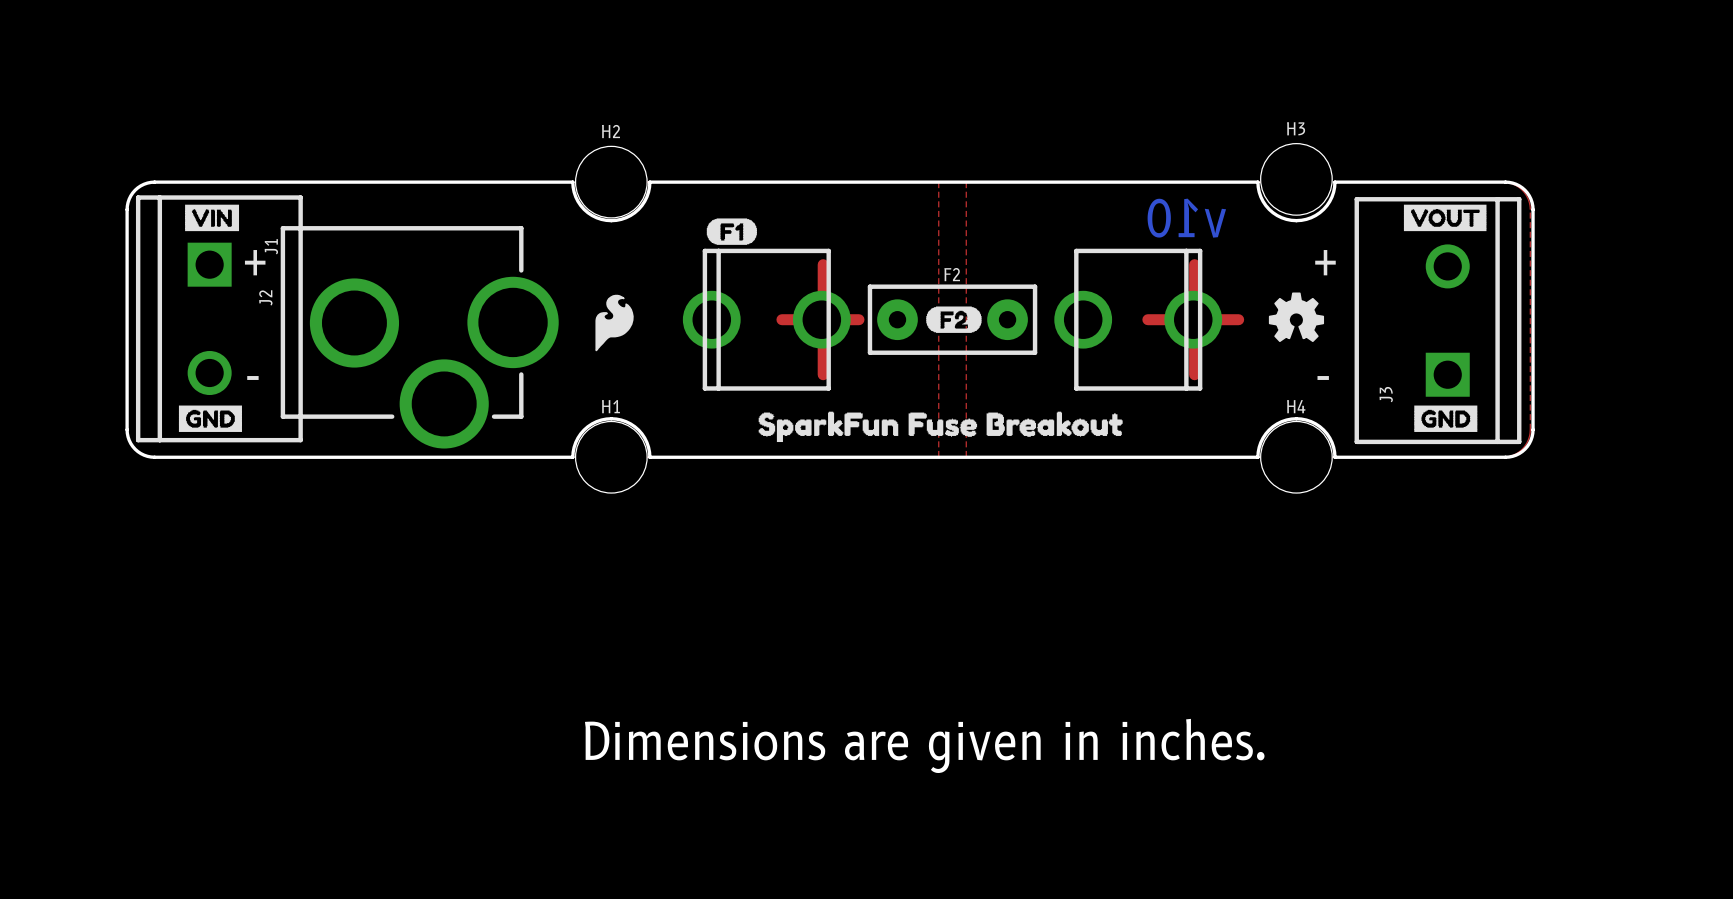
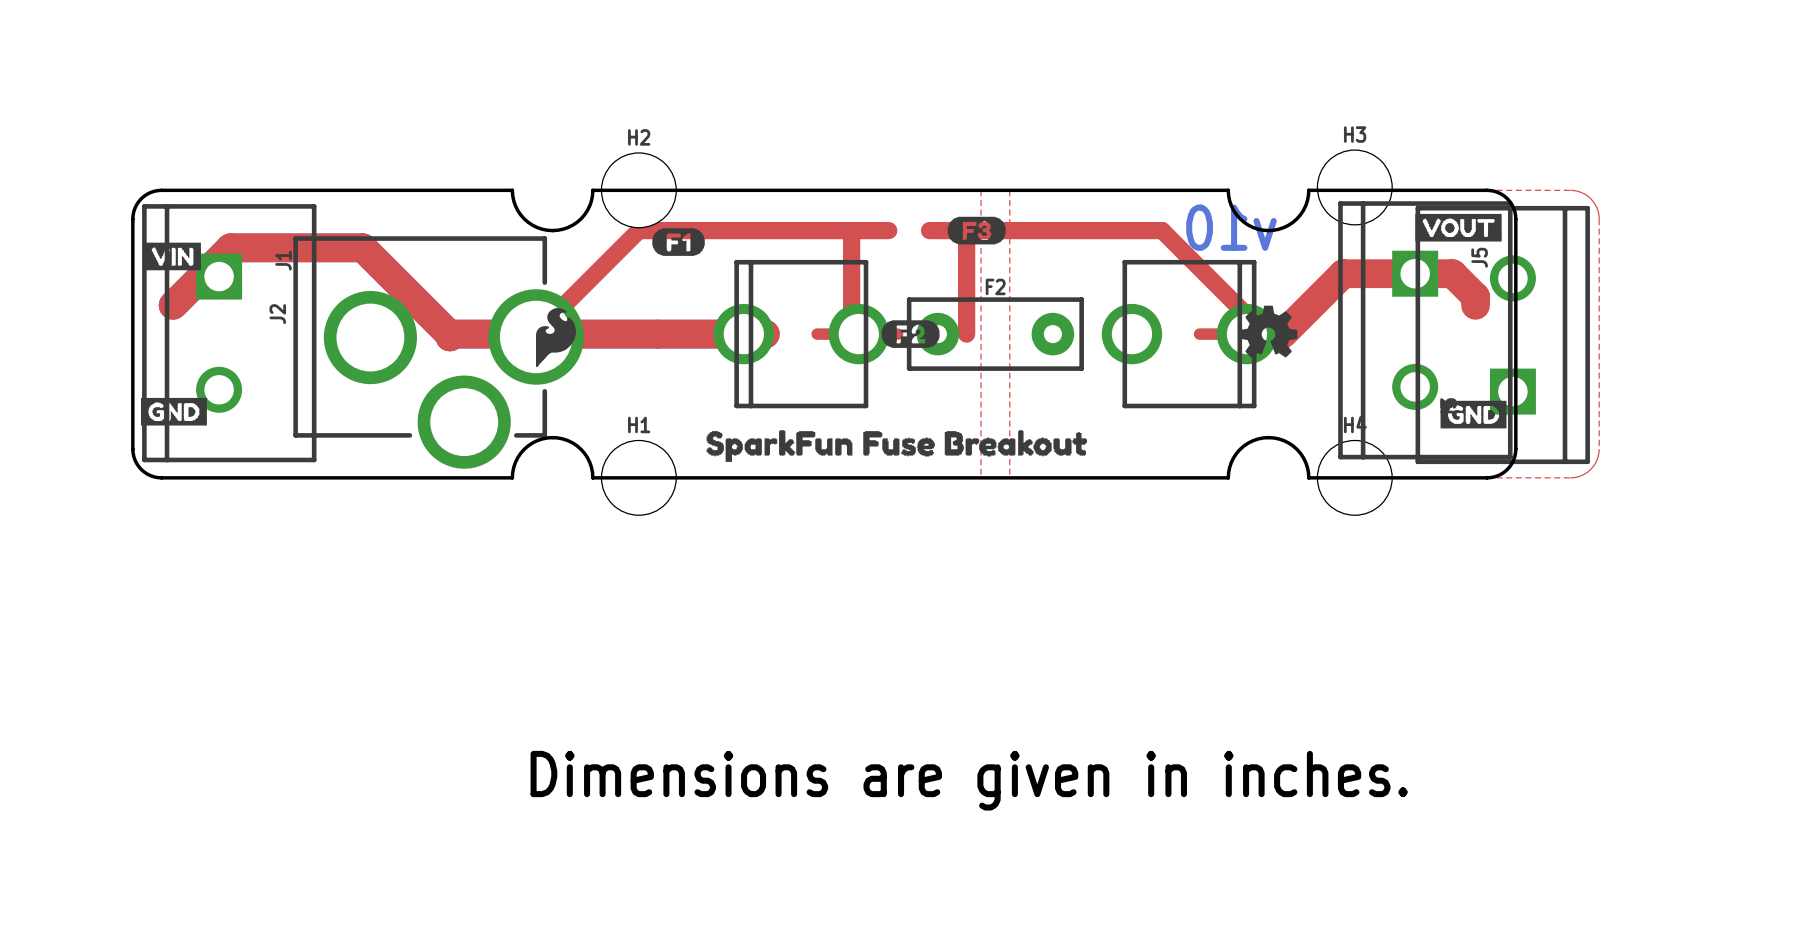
board edge: (490, 182) (567, 182) -> (512, 190) (515, 205) (524, 218) (537, 227) (552, 230) (568, 227) (581, 218) (589, 205) (592, 190)
board edge: (572, 182) (575, 196) (584, 209) (596, 217) (611, 220) (626, 217) (638, 209) (646, 196) (649, 182) -> (598, 190) (679, 190)
board edge: (1175, 182) (1252, 182) -> (1228, 190) (1231, 205) (1240, 218) (1253, 227) (1268, 230) (1283, 227) (1297, 218) (1305, 205) (1308, 190)
board edge: (1257, 182) (1260, 196) (1269, 209) (1281, 217) (1296, 220) (1311, 217) (1323, 209) (1332, 196) (1334, 182) -> (1314, 190) (1395, 190)
board edge: (1422, 182) (1512, 183) (1527, 192) (1533, 209) (1533, 429) (1530, 440) (1522, 451) (1509, 457) (1422, 457) -> (1487, 190) (1498, 192) (1507, 198) (1513, 208) (1515, 219) (1515, 452) (1511, 463) (1504, 471) (1487, 477)
drawing: none -> [947, 216, 1006, 245]
drawing position: (212, 217) -> (172, 256)
drawing position: (1445, 217) -> (1458, 227)
top track: none -> (851, 230) (851, 334)
top track: none -> (888, 230) (638, 230) (535, 334)
top track: none -> (929, 230) (1162, 230) (1265, 334)
top track: none -> (966, 230) (966, 334)
drawing position: (731, 231) -> (678, 242)
text: + (255, 262) -> none
text: + (1325, 262) -> none
top track: (823, 264) (823, 374) -> none
top track: (1194, 264) (1194, 374) -> none
top track: none -> (173, 305) (230, 247) (362, 247) (449, 336) (452, 334) (765, 334)
J5: none -> (1425, 330)
drawing position: (1296, 317) -> (1268, 331)
drawing position: (953, 319) -> (910, 334)
top track: (1227, 319) (1238, 319) -> (1282, 334) (1343, 273) (1452, 273) (1475, 296) (1475, 305)
drawing position: (614, 323) -> (555, 337)
text: - (252, 378) -> none
text: - (1323, 378) -> none
drawing position: (210, 418) -> (173, 411)
drawing position: (1445, 418) -> (1473, 414)
drawing position: (940, 426) -> (896, 446)
board edge: (490, 457) (567, 457) -> (512, 477) (515, 462) (524, 449) (537, 440) (552, 437) (568, 440) (581, 449) (589, 462) (592, 477)
board edge: (572, 457) (575, 442) (584, 430) (596, 421) (611, 418) (626, 421) (638, 430) (646, 442) (649, 457) -> (598, 477) (679, 477)
board edge: (1175, 457) (1252, 457) -> (1228, 477) (1231, 462) (1240, 449) (1253, 440) (1268, 437) (1283, 440) (1297, 449) (1305, 462) (1308, 477)
board edge: (1257, 457) (1260, 442) (1269, 430) (1281, 421) (1296, 418) (1311, 421) (1323, 430) (1332, 442) (1334, 457) -> (1314, 477) (1395, 477)
text position: Dimensions are given in inches. (924, 745) -> Dimensions are given in inches. (969, 780)

